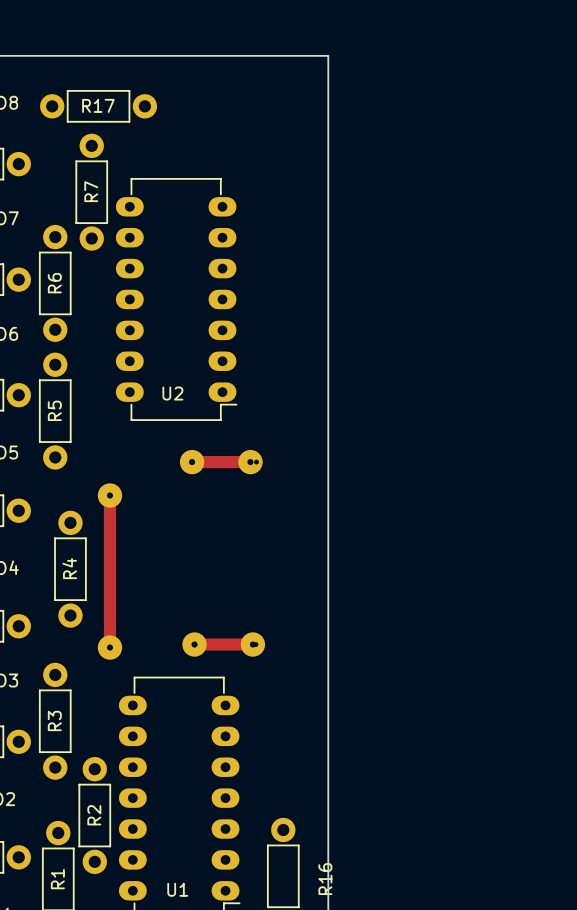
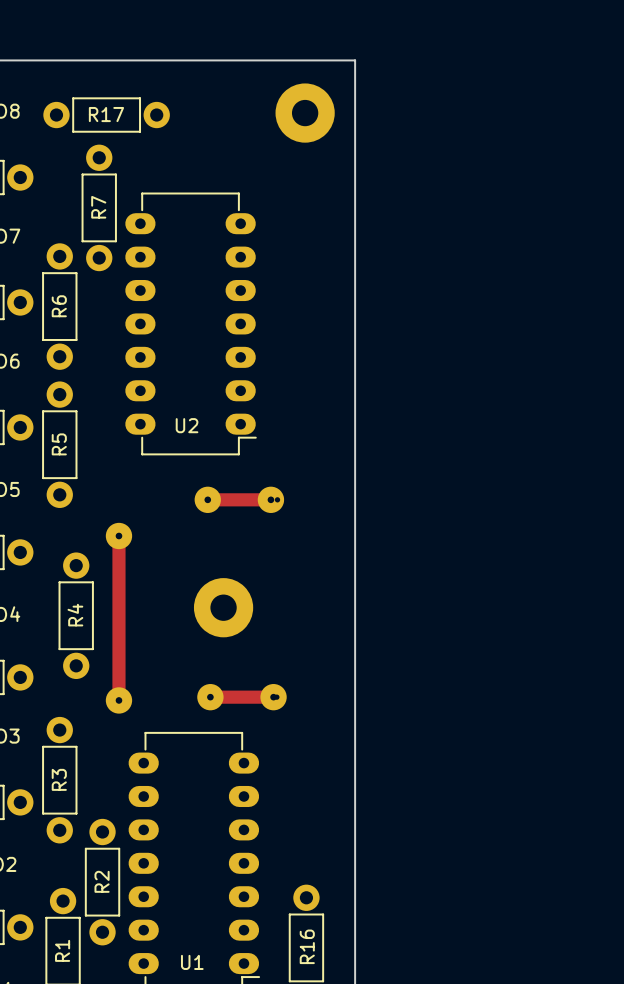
part: none -> (305, 113)
part: none -> (223, 607)
R16 name position: R16 (325, 879) -> R16 (307, 946)

